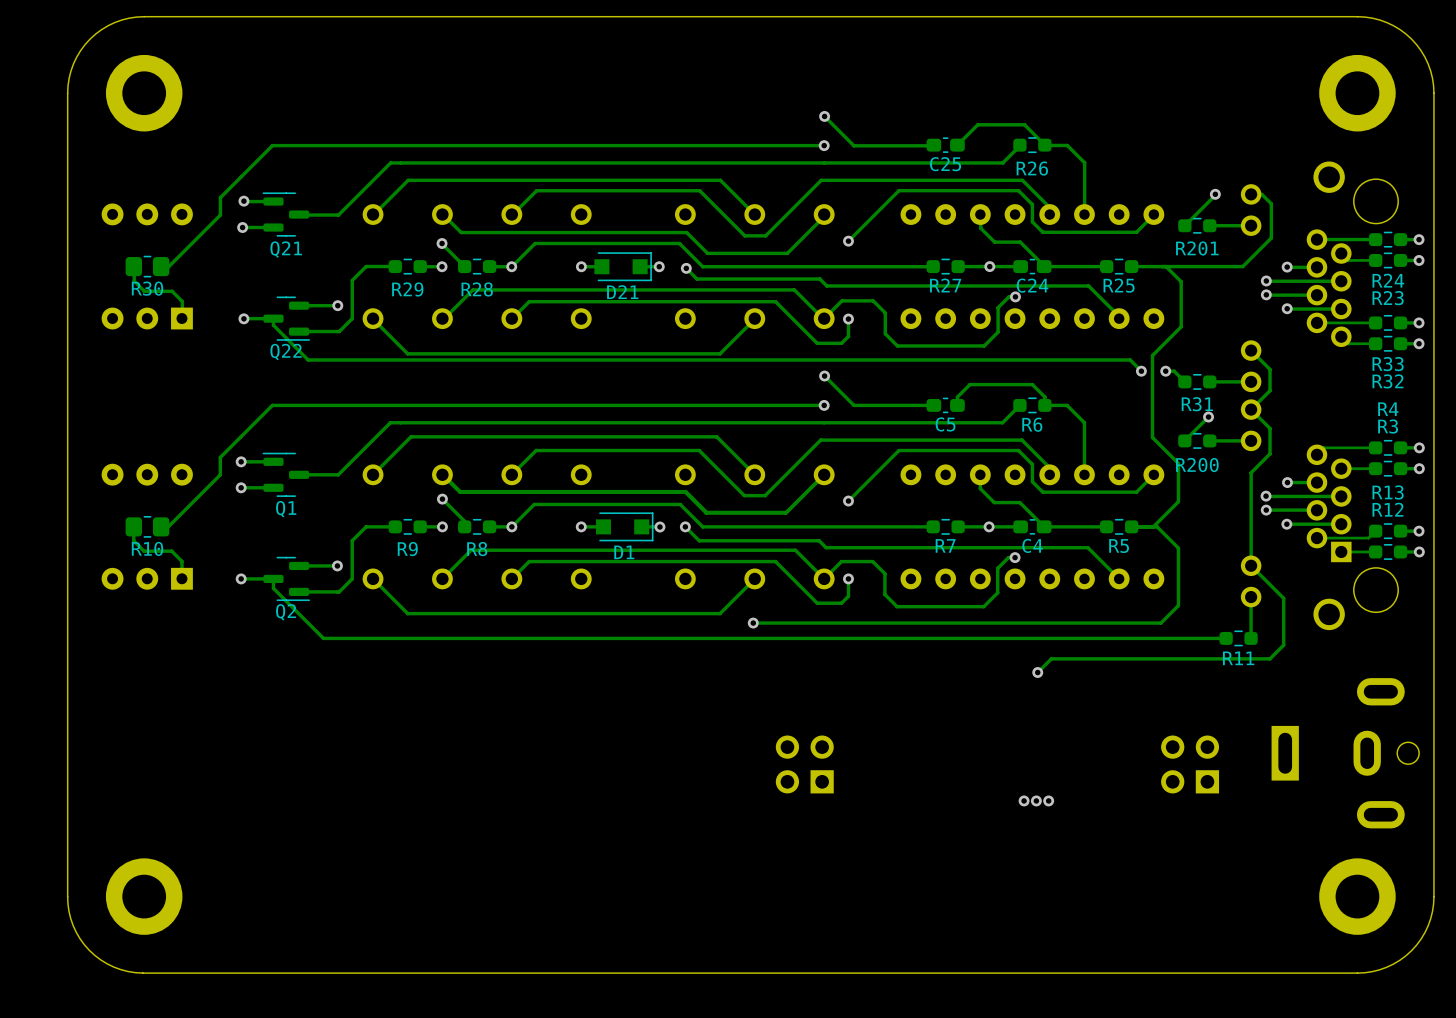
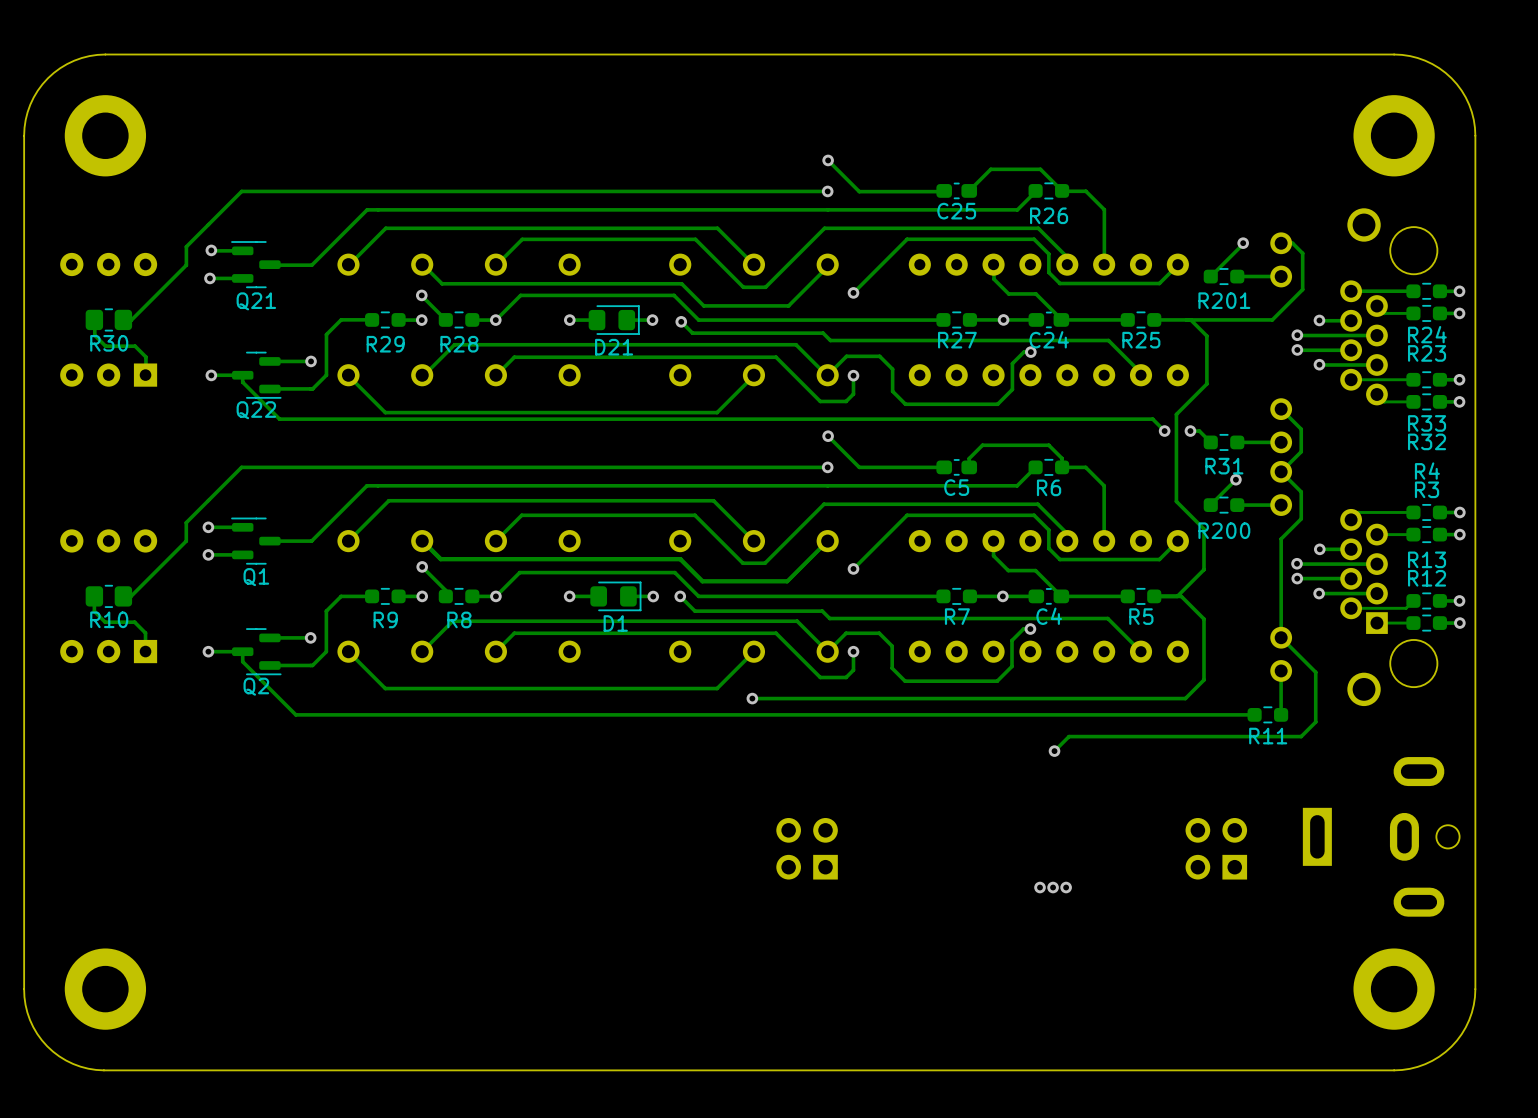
D21 footprint: [594, 252, 652, 282] -> [588, 305, 640, 335]
D1 footprint: [595, 512, 654, 542] -> [590, 581, 642, 612]

